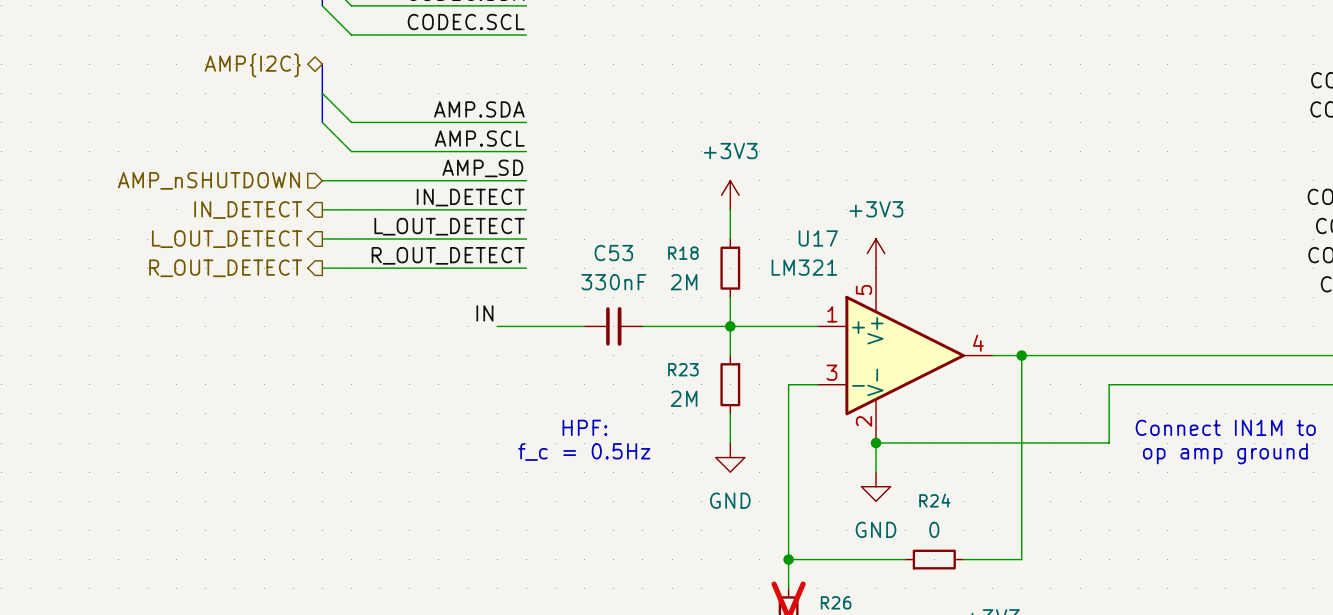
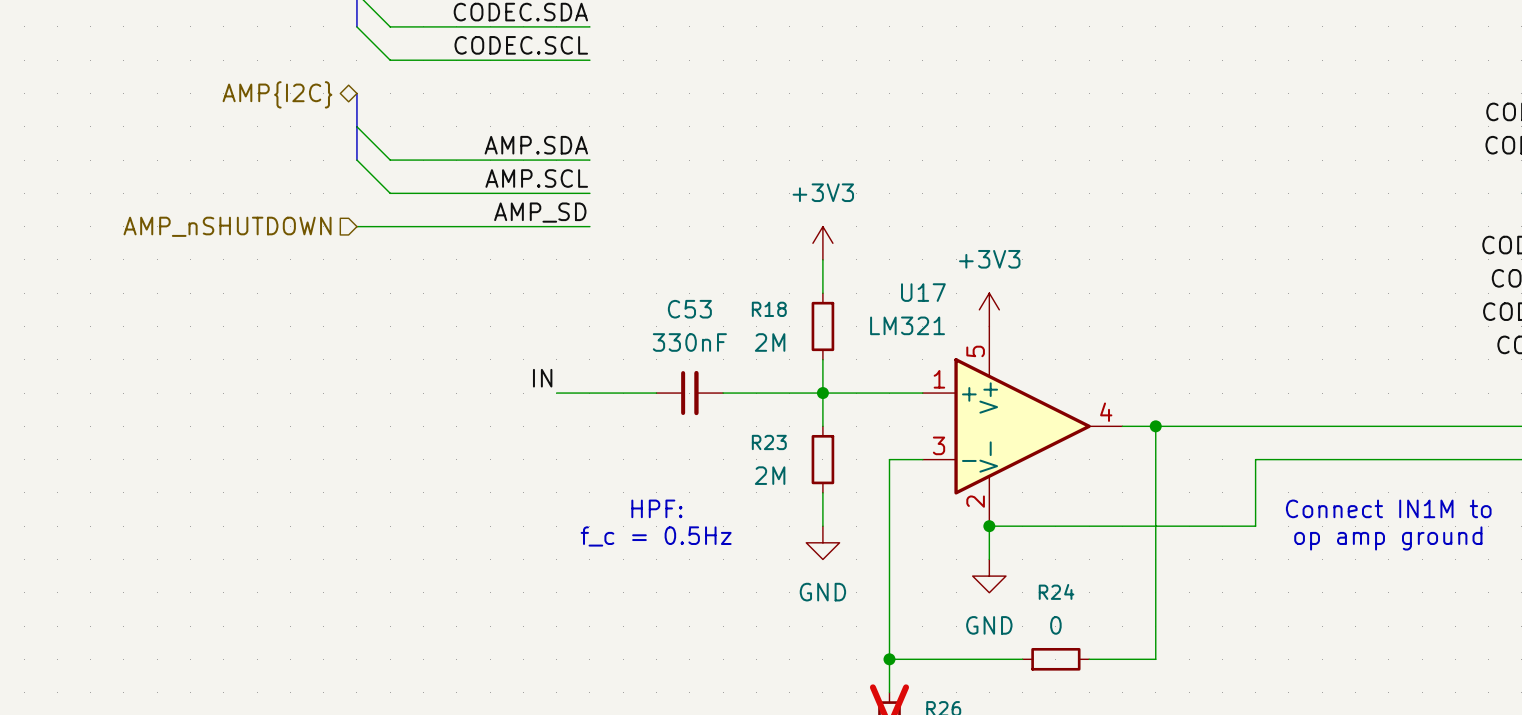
label: IN_DETECT (470, 197) -> none
wire: (322, 209) (526, 209) -> none
hierarchical label: IN_DETECT (248, 210) -> none
label: L_OUT_DETECT (449, 226) -> none
hierarchical label: L_OUT_DETECT (227, 239) -> none
wire: (322, 239) (526, 239) -> none
label: R_OUT_DETECT (448, 255) -> none
hierarchical label: R_OUT_DETECT (225, 268) -> none
wire: (322, 268) (526, 268) -> none

